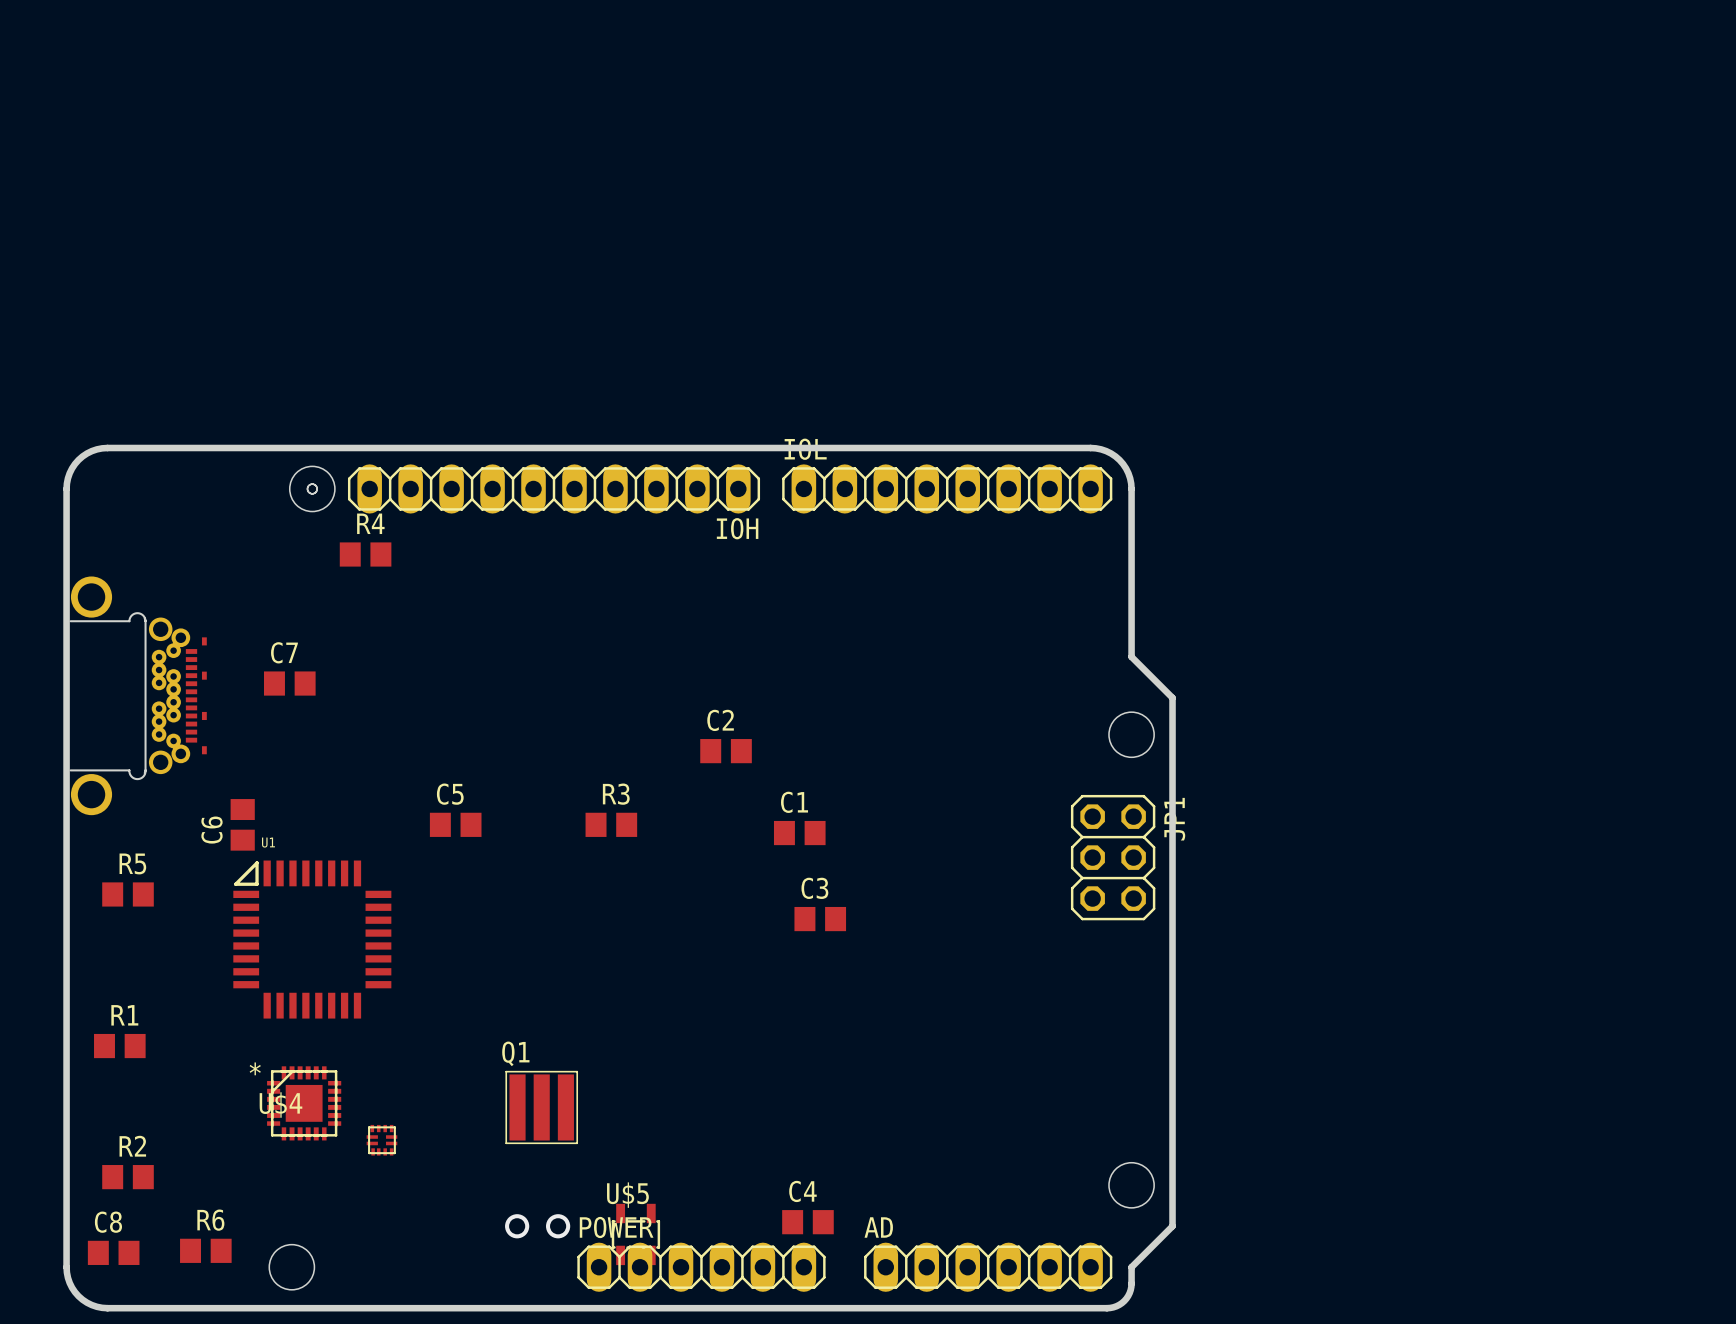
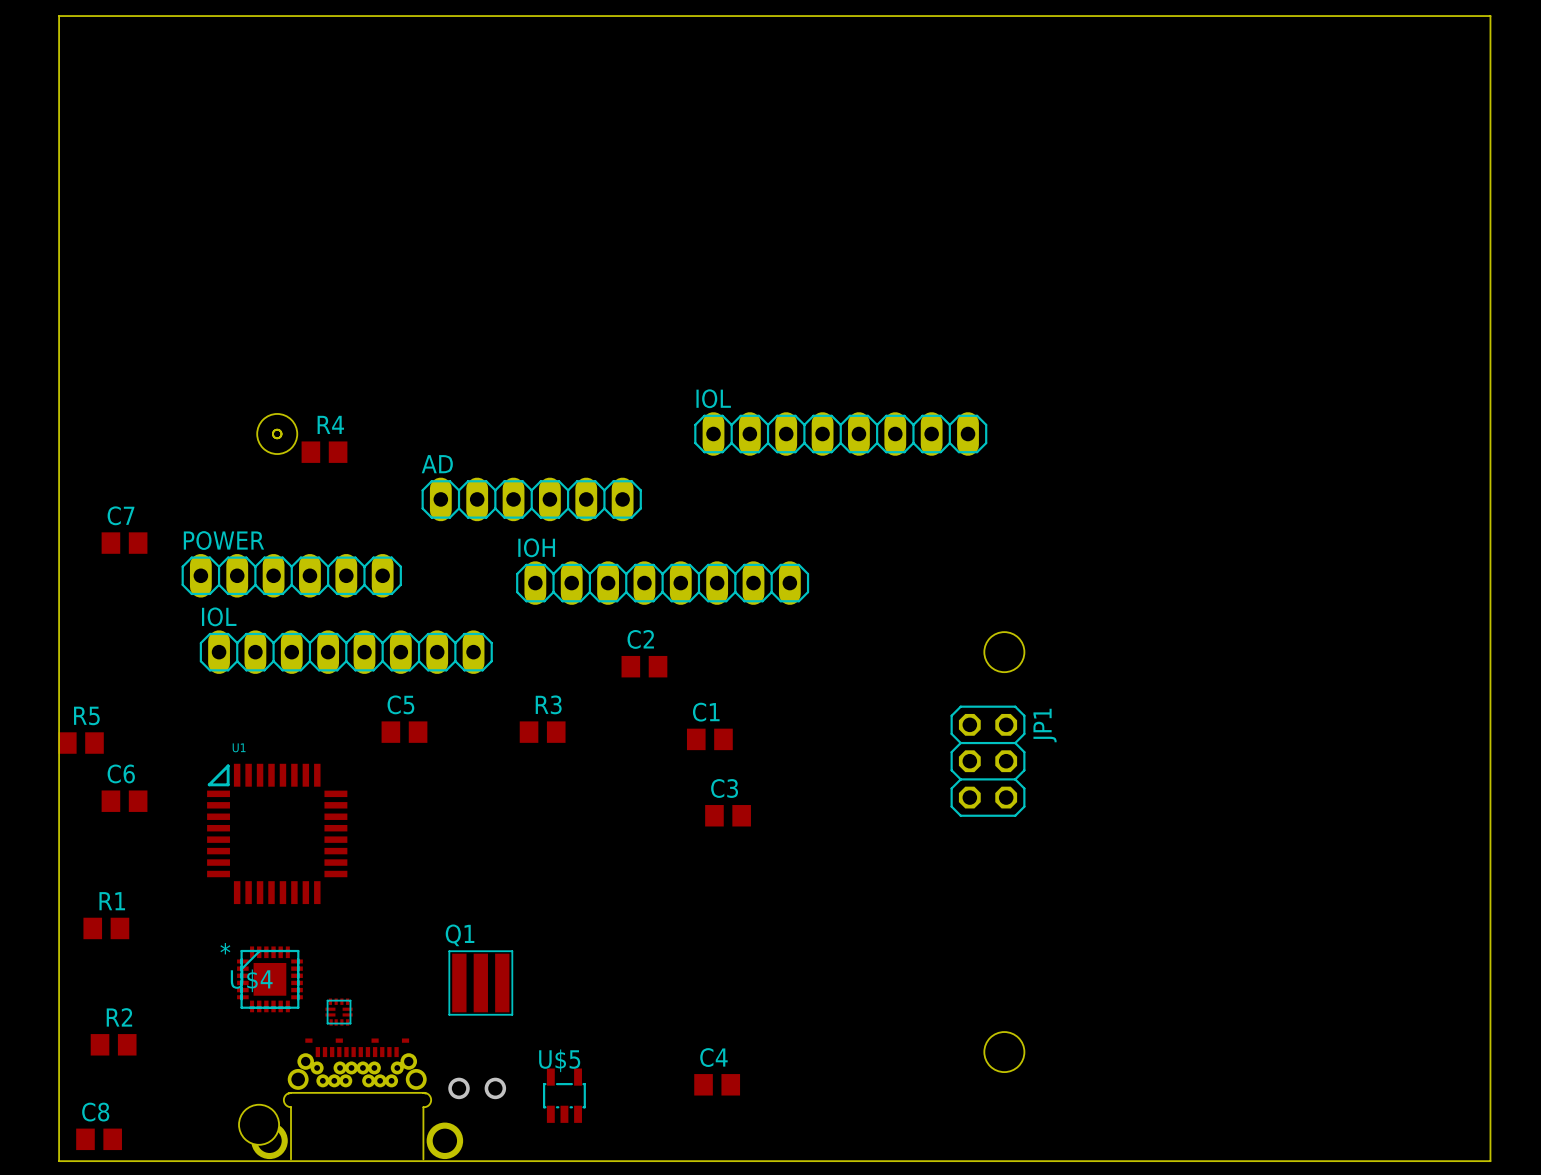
board edge: (66, 488) (69, 473) (78, 459) (91, 451) (107, 448) (1090, 448) (1101, 449) (1115, 456) (1126, 468) (1131, 483) (1131, 656) (1172, 697) (1172, 1226) (1131, 1267) (1131, 1286) (1126, 1298) (1116, 1306) (1106, 1308) -> (59, 434) (59, 16) (1490, 16) (1490, 1161) (982, 1161)
board edge width: thick (66, 488) (66, 1267) -> thin (59, 434) (59, 1124)
IOH: (554, 488) -> none
R4 position: (365, 554) -> (324, 452)
AD: none -> (531, 499)
POWER: none -> (291, 575)
IOH: none -> (662, 583)
C7 position: (289, 683) -> (124, 543)
part: (138, 695) -> none
IOL: none -> (346, 652)
C6 rotation: 0° (242, 824) -> 90° clockwise (124, 801)
C6 position: (242, 824) -> (124, 801)
R5 position: (128, 894) -> (80, 743)
part: none -> (357, 1099)
R6: (205, 1250) -> none
C8 position: (113, 1252) -> (99, 1139)
board edge: (66, 1267) (69, 1282) (78, 1296) (91, 1305) (107, 1308) -> (59, 1124) (59, 1161) (95, 1161)
POWER: (701, 1267) -> none
AD: (988, 1267) -> none
board edge width: thick (107, 1308) (1106, 1308) -> thin (95, 1161) (982, 1161)

